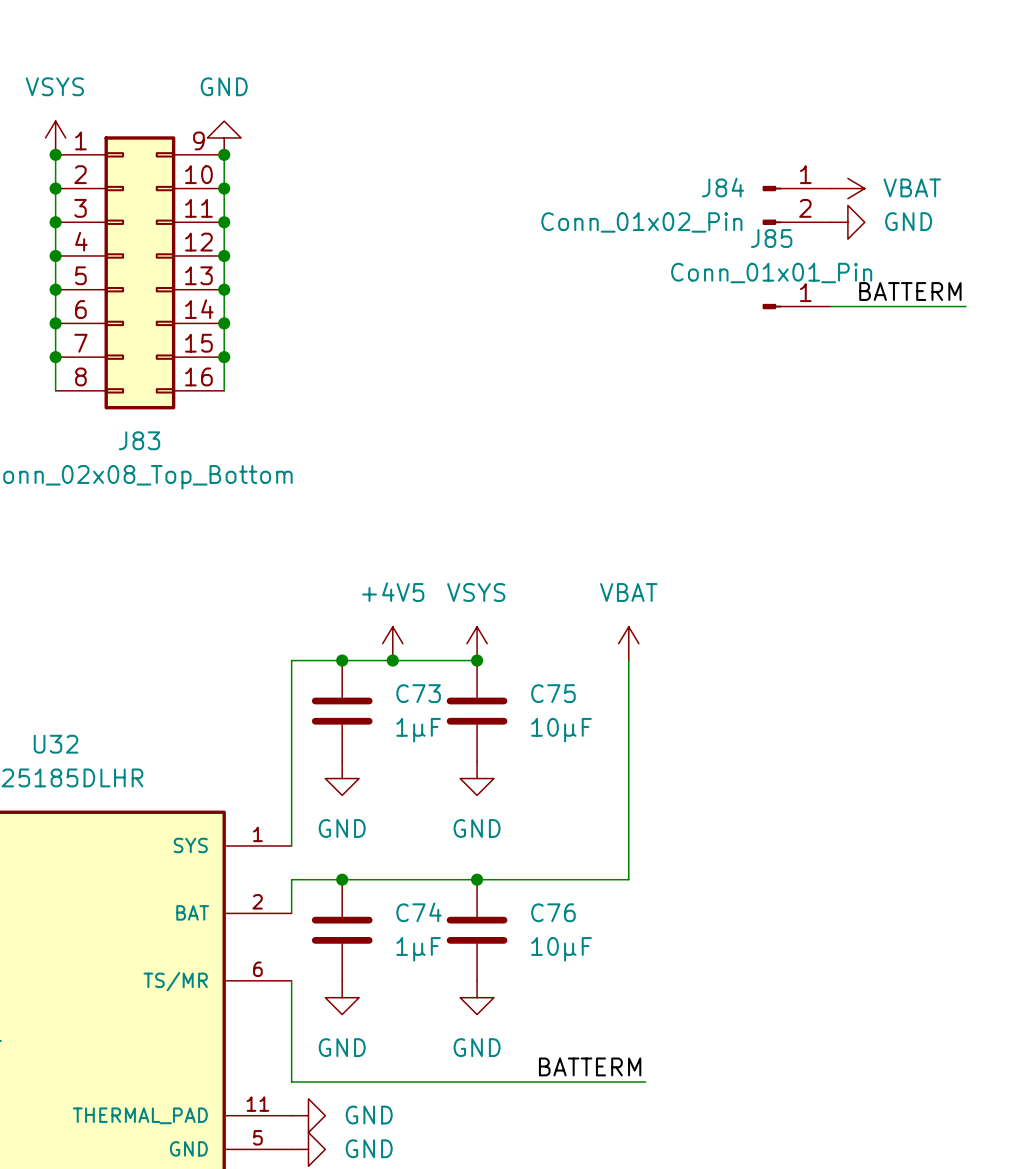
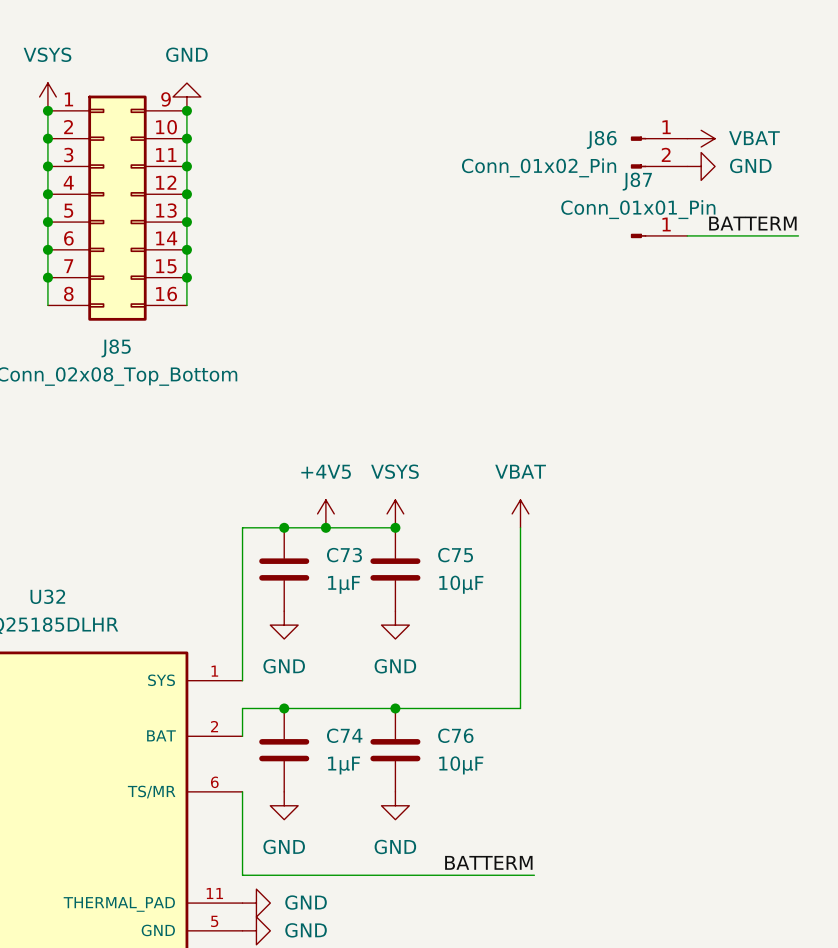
J84 name: J84 (722, 187) -> J86 (601, 139)
J85 name: J85 (771, 238) -> J87 (637, 181)
J83 name: J83 (139, 440) -> J85 (116, 348)

